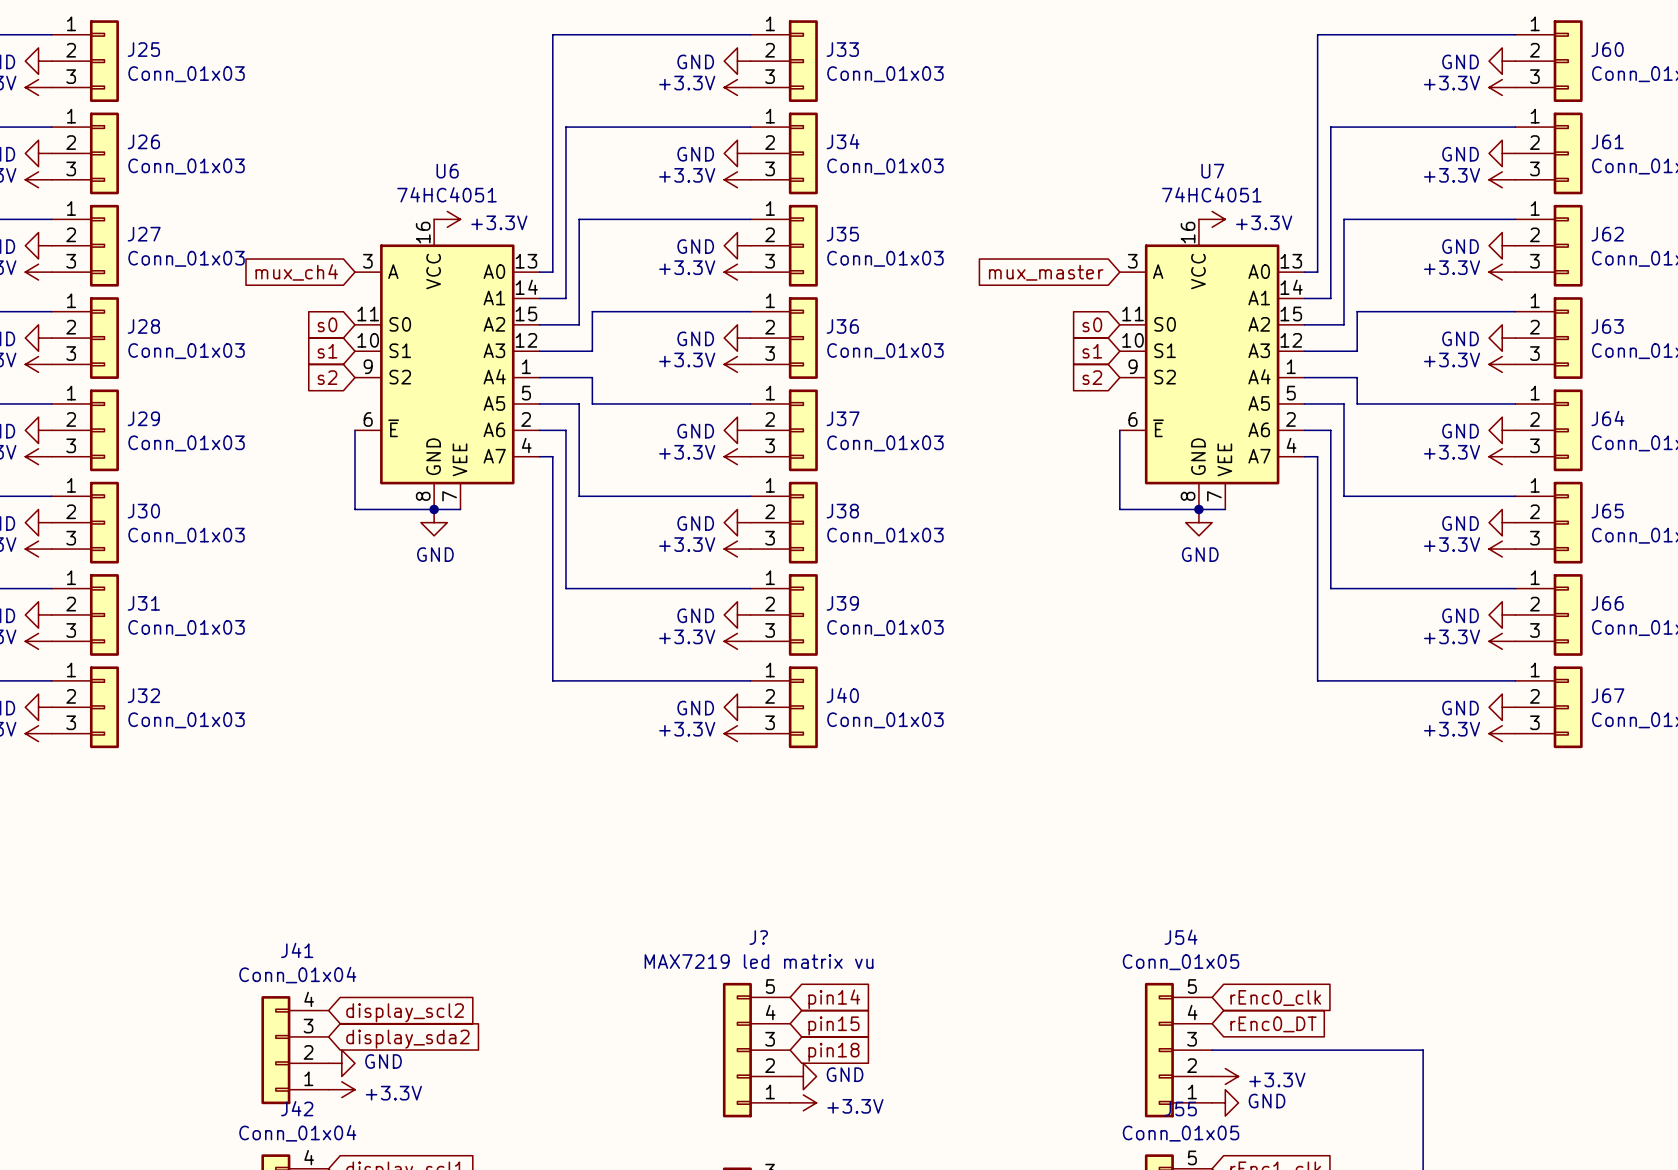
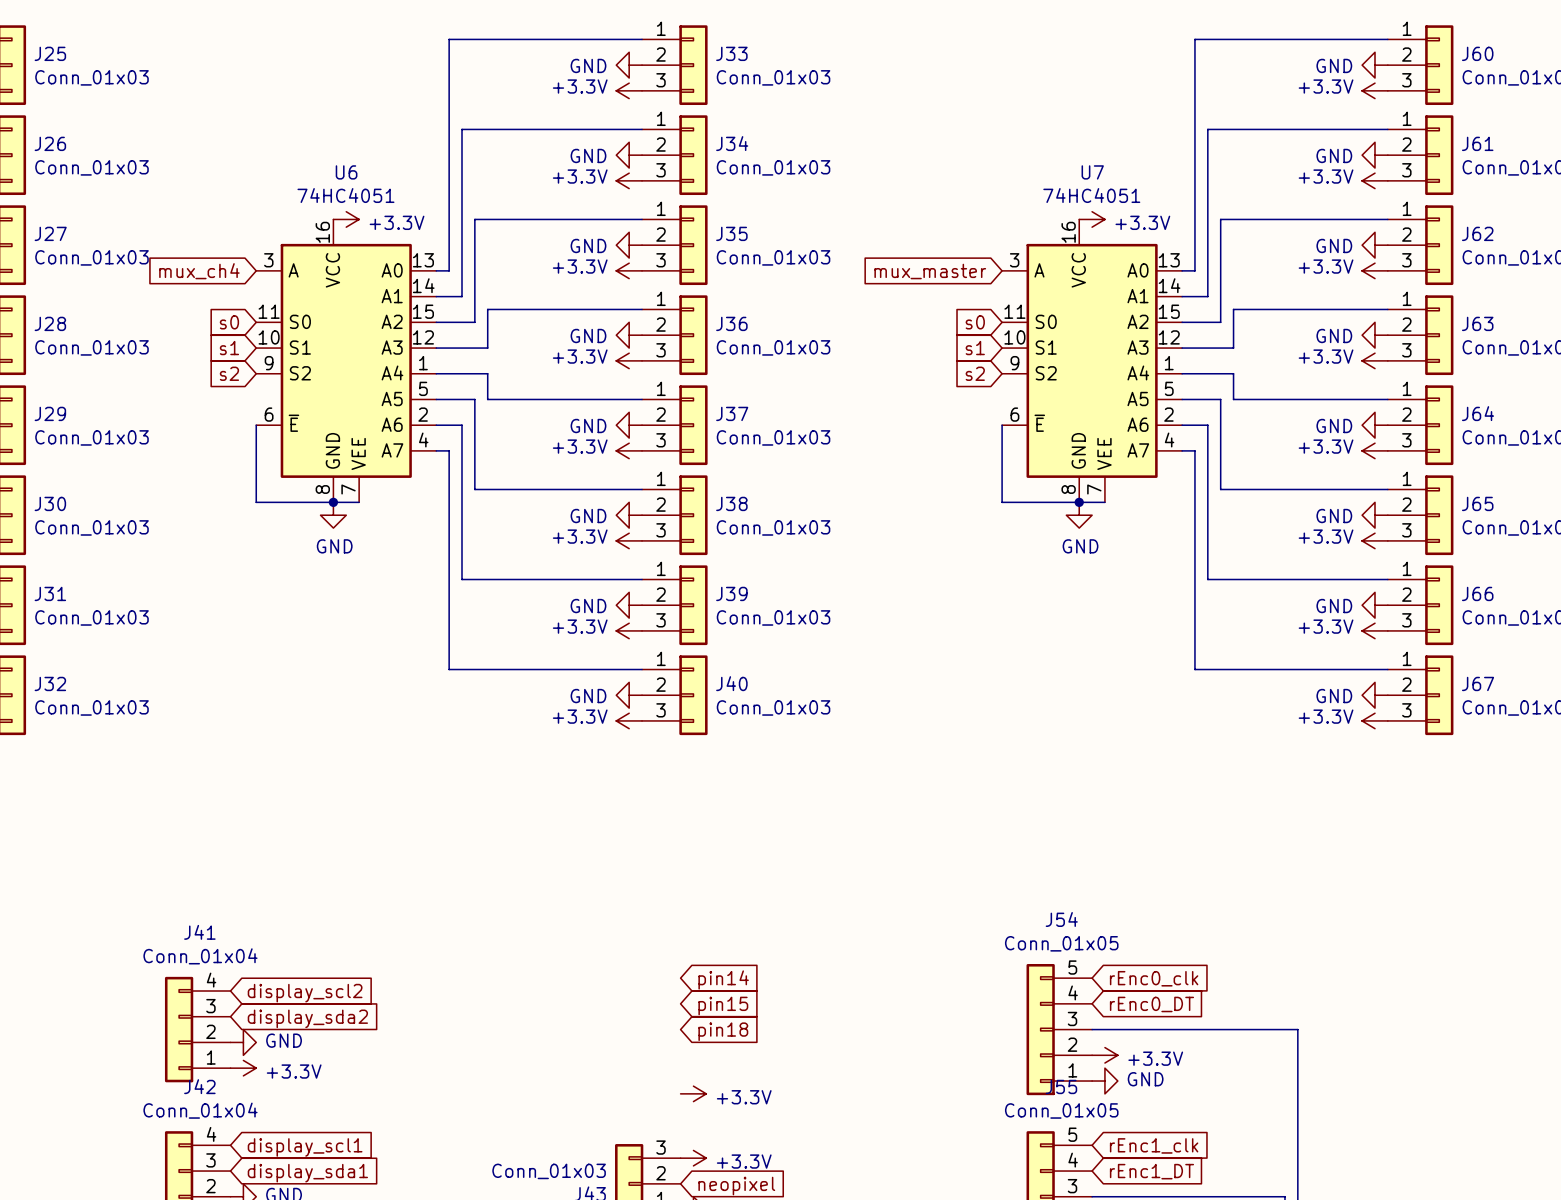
J?: MAX7219 led matrix vu (756, 1050) -> none
power symbol: GND (803, 1076) -> none
power symbol position: +3.3V (803, 1102) -> +3.3V (693, 1093)

